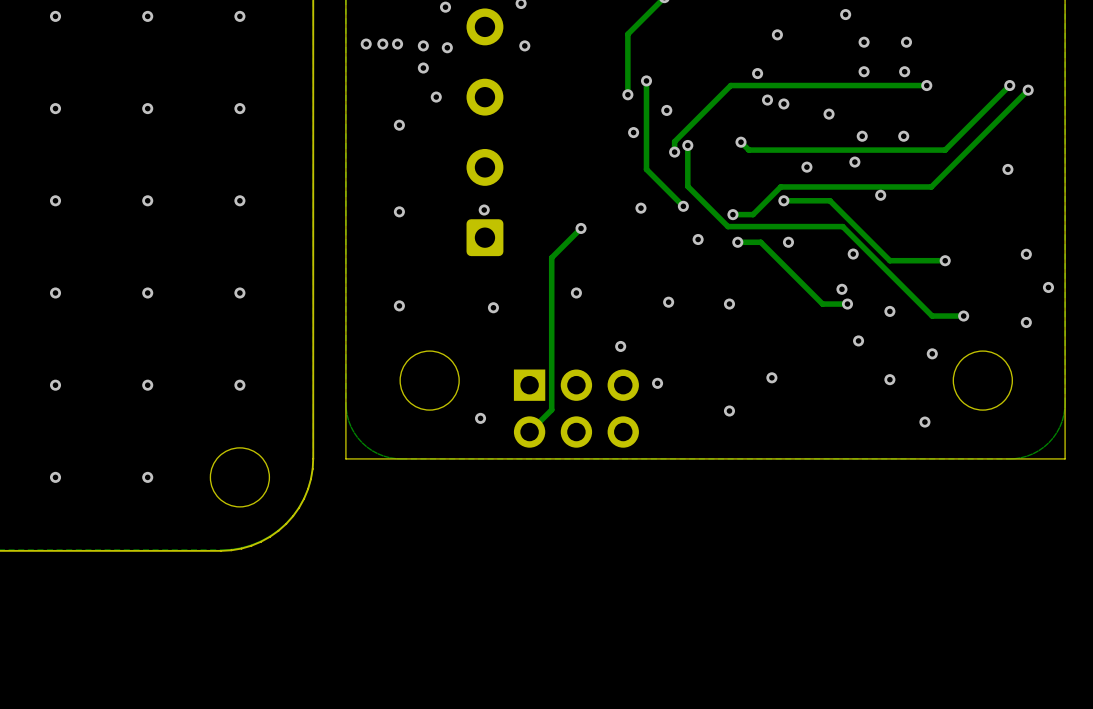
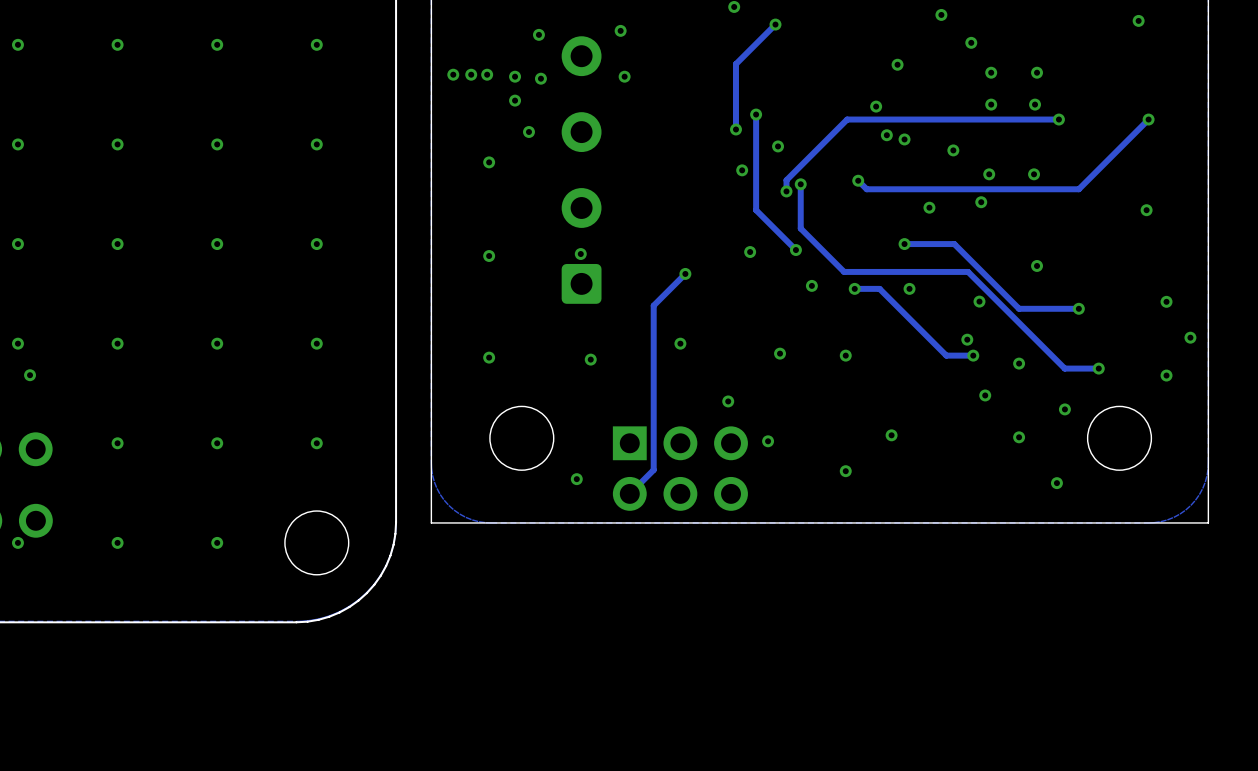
track: (1028, 90) (931, 186) (780, 186) (753, 214) (732, 214) -> none
via: (1028, 90) -> none
via position: (880, 195) -> (1037, 265)
via: (732, 214) -> none

